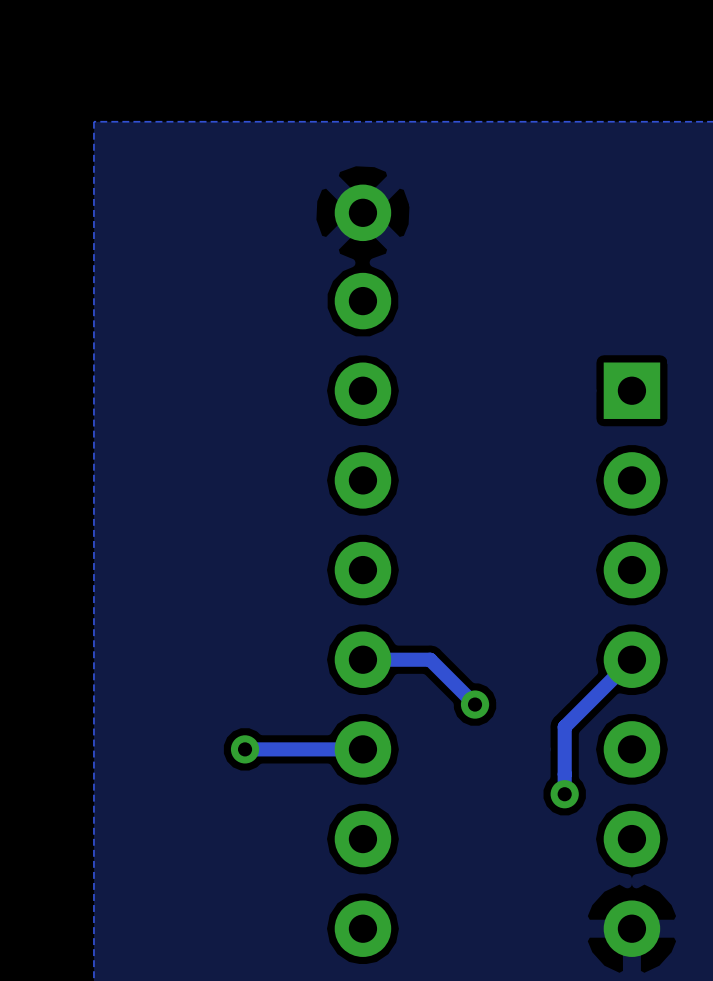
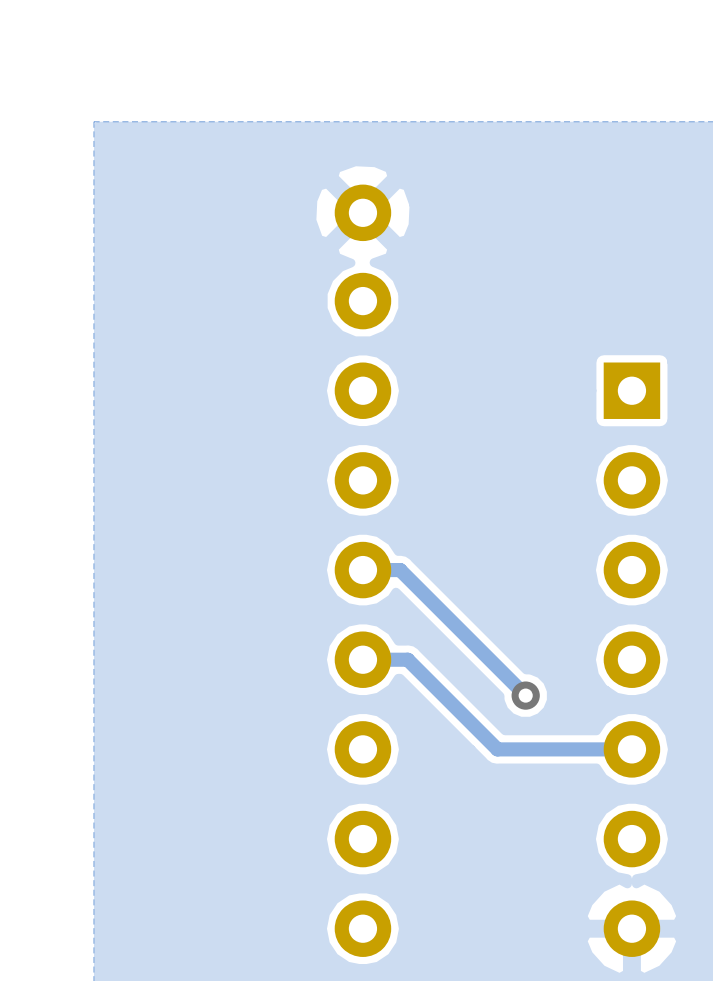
track: none -> (362, 570) (400, 570) (525, 695)
track: (407, 659) (430, 659) (475, 704) -> (407, 659) (497, 749) (631, 749)
track: (631, 659) (564, 726) (564, 794) -> none
via position: (475, 704) -> (525, 695)
via: (245, 749) -> none
track: (362, 749) (245, 749) -> none
via: (564, 794) -> none

